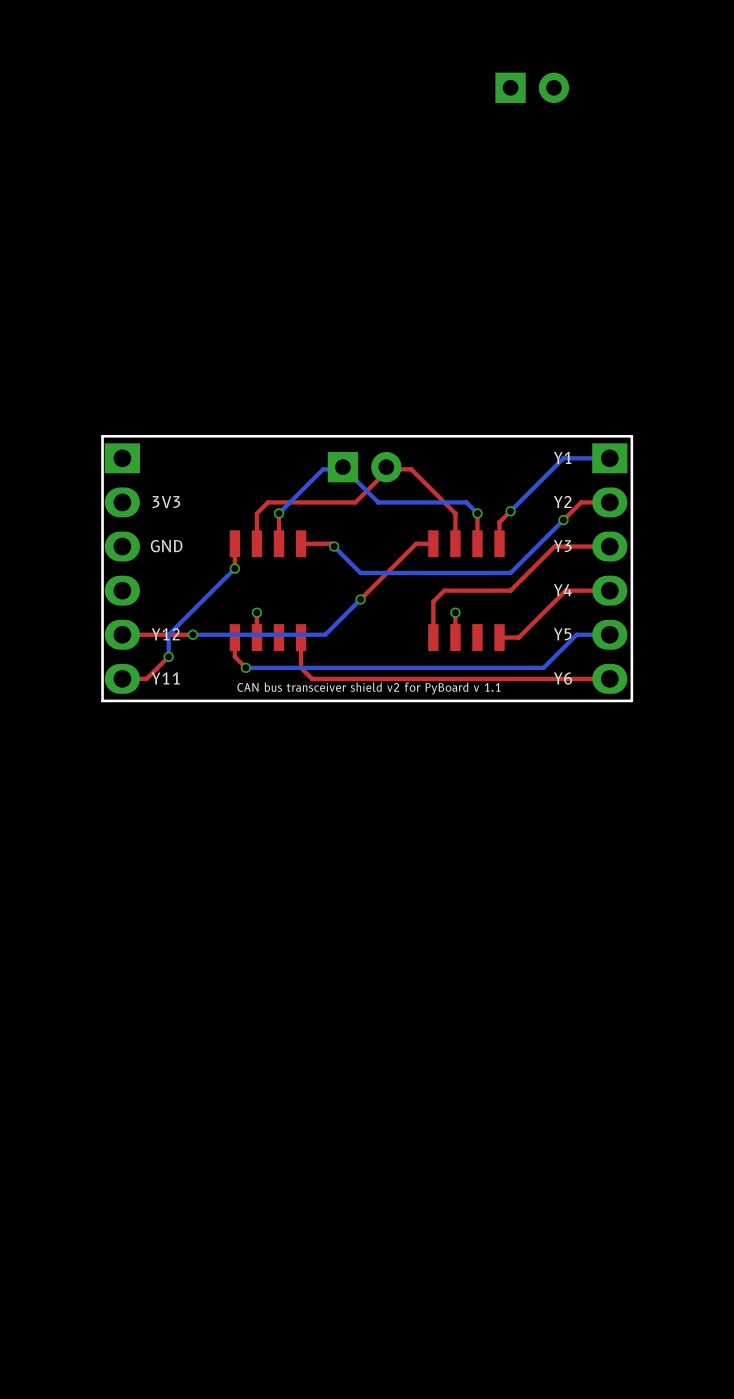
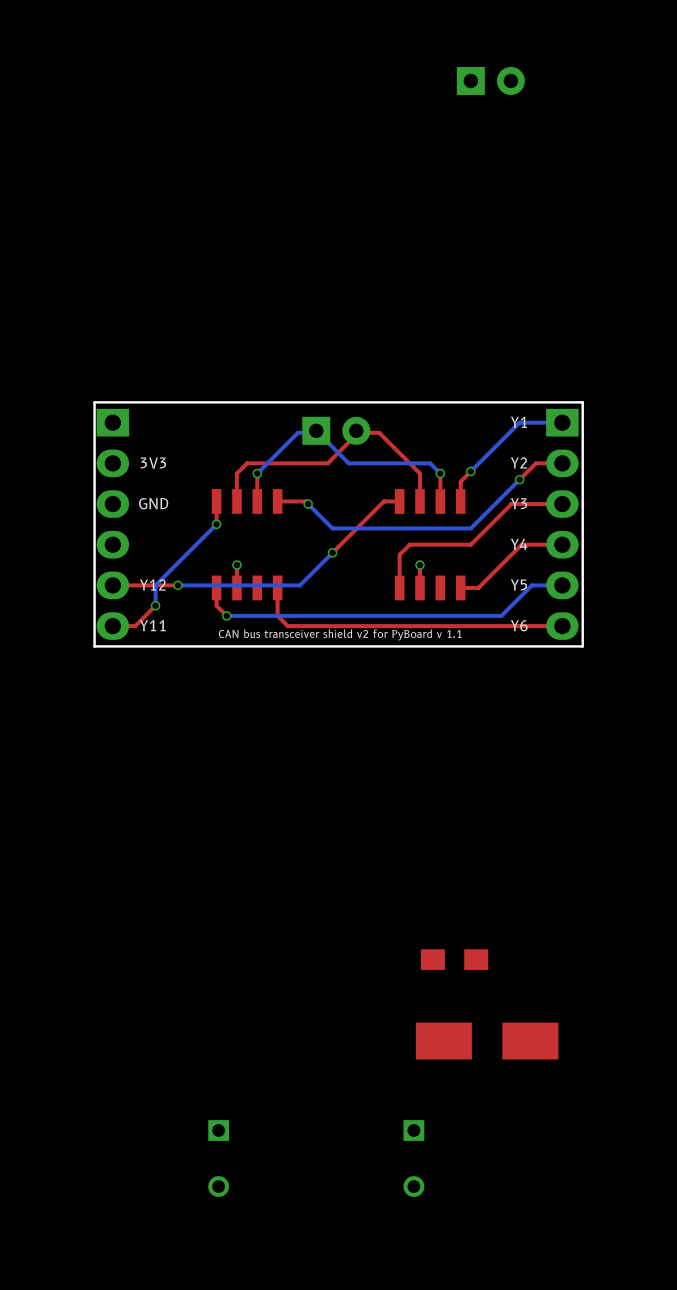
part: none -> (454, 959)
part: none -> (487, 1041)
part: none -> (218, 1158)
part: none -> (413, 1158)

